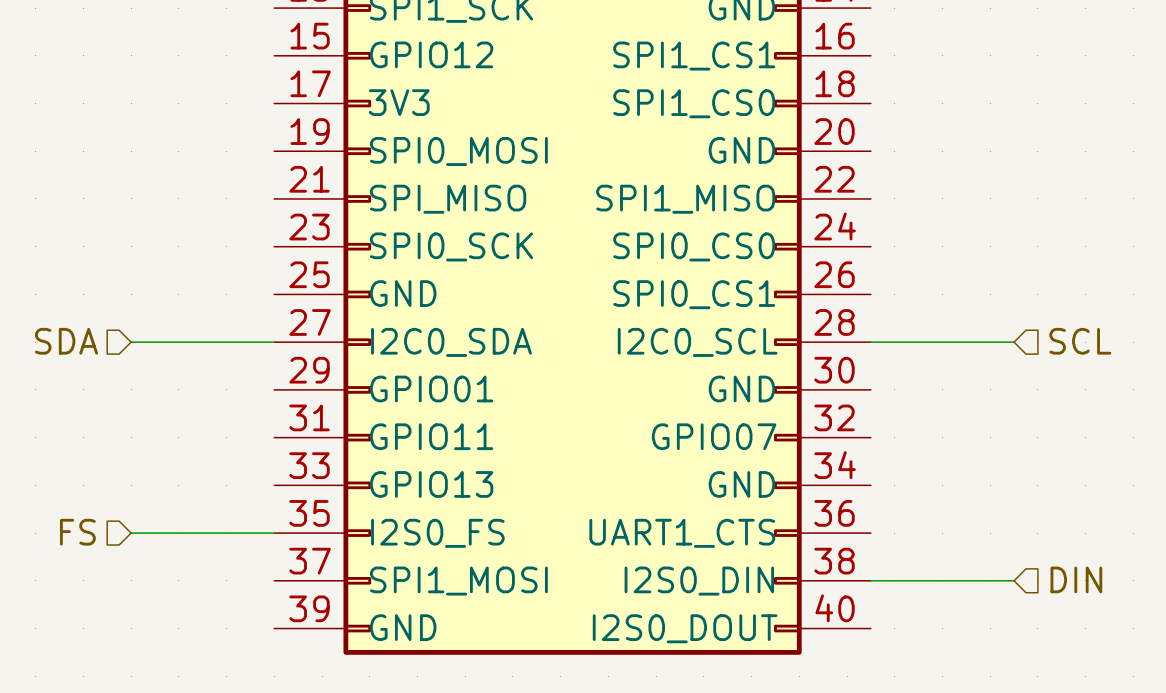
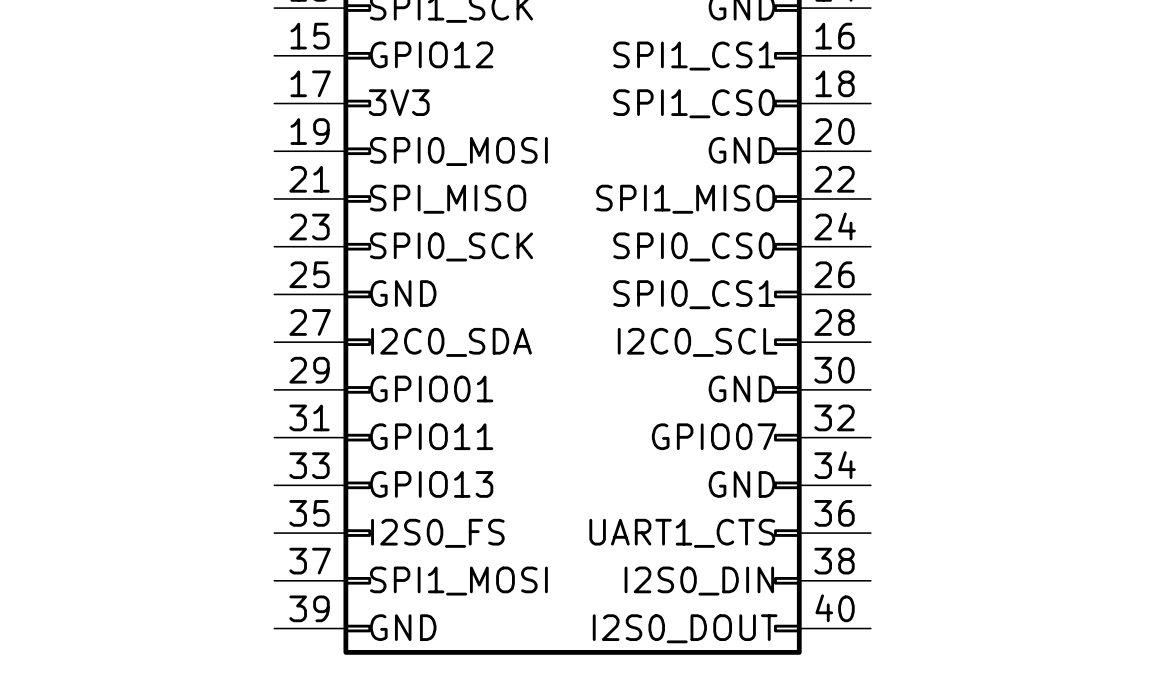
hierarchical label: SDA (66, 341) -> none
hierarchical label: SCL (1080, 341) -> none
wire: (131, 342) (274, 342) -> none
wire: (870, 342) (1014, 342) -> none
hierarchical label: FS (77, 532) -> none
wire: (131, 533) (274, 533) -> none
hierarchical label: DIN (1076, 579) -> none
wire: (870, 580) (1014, 580) -> none

